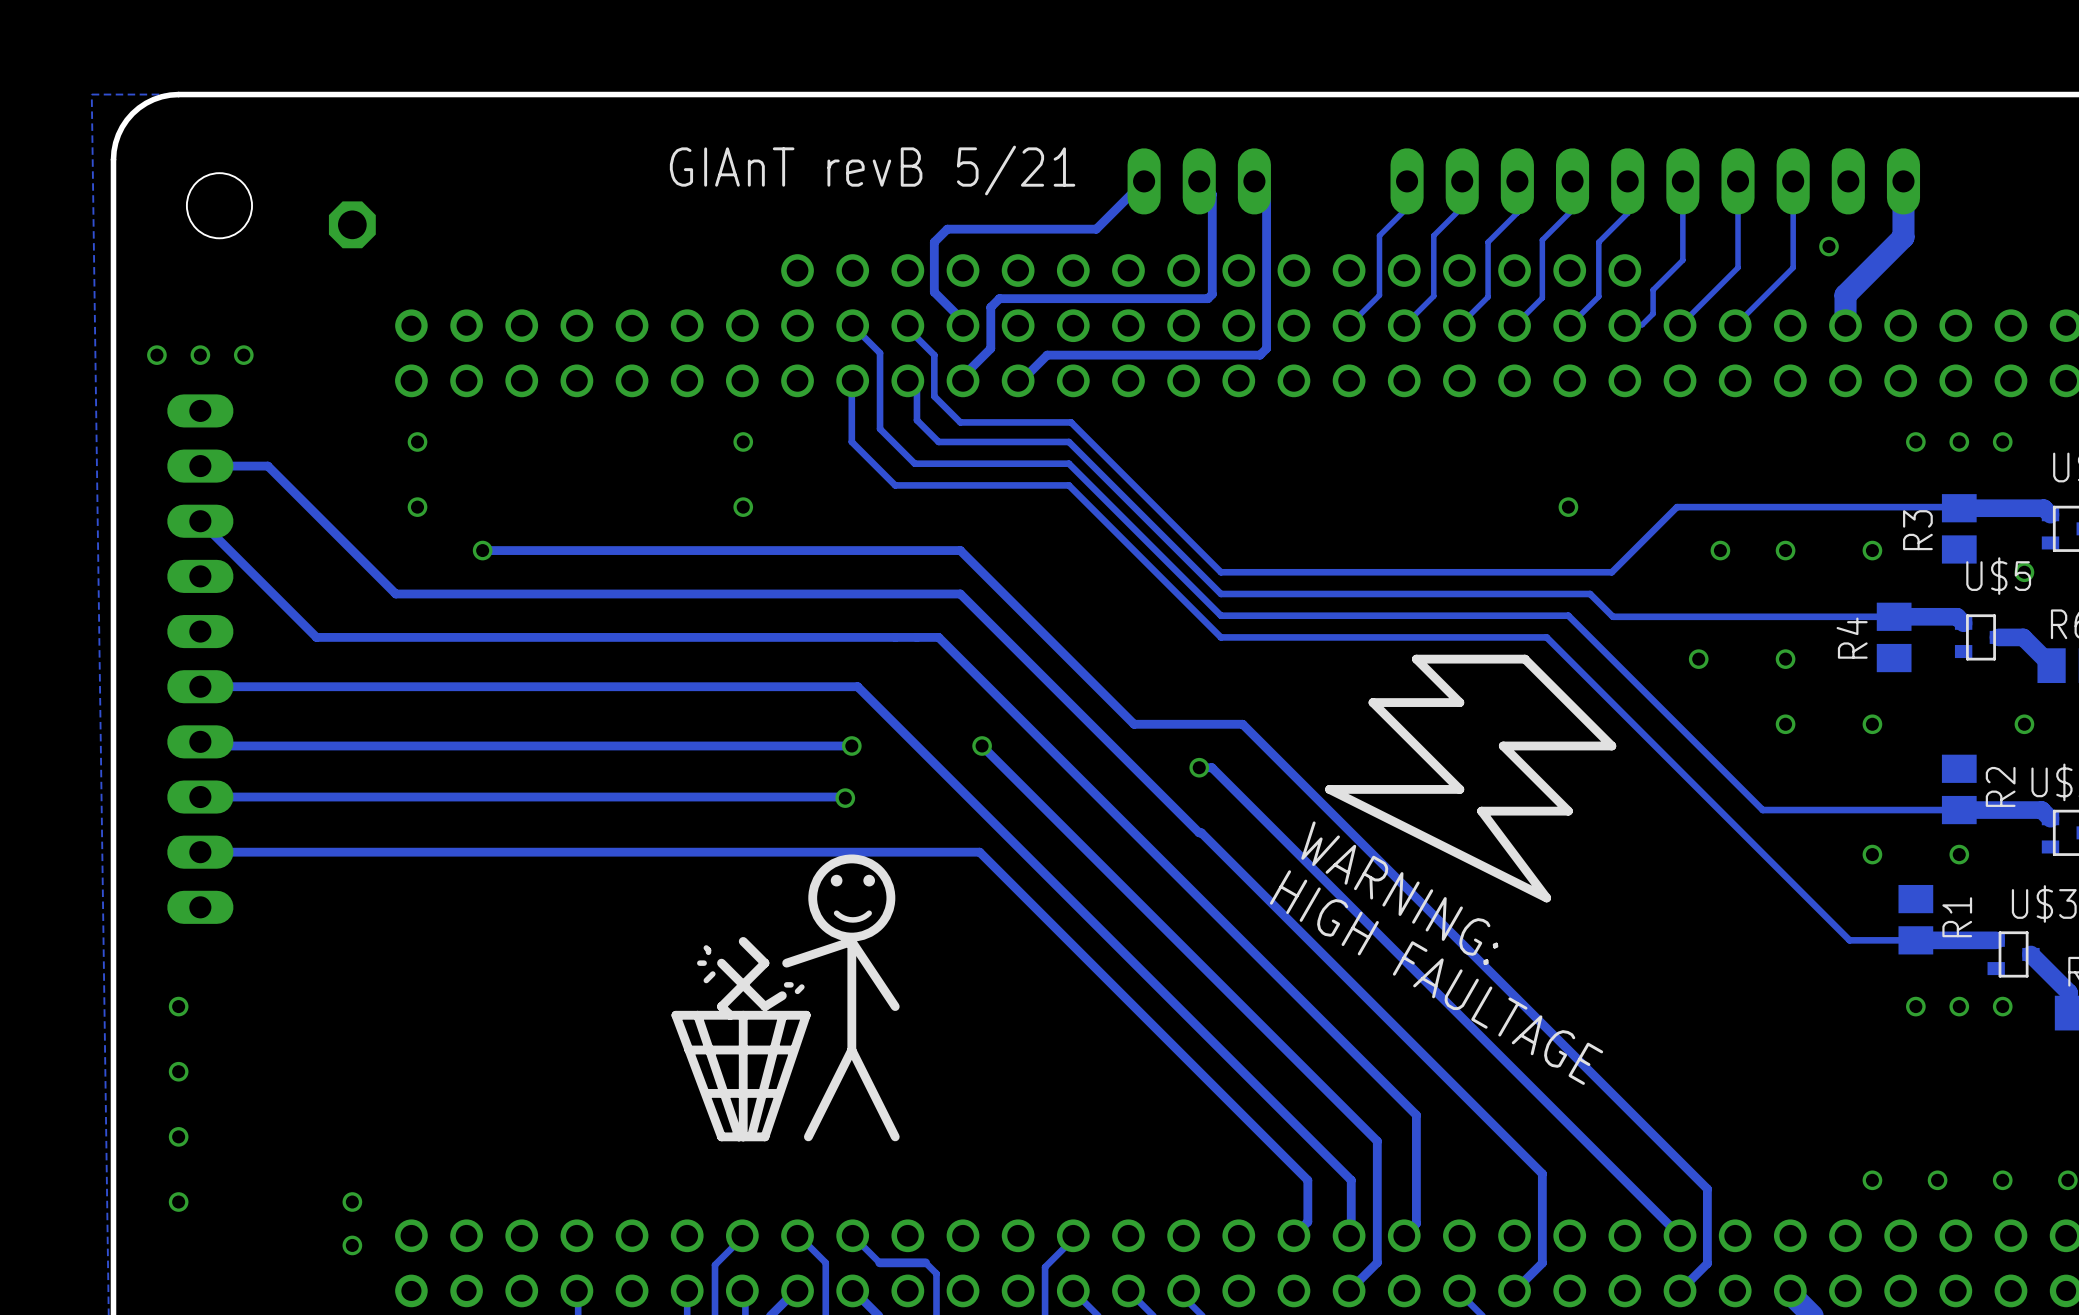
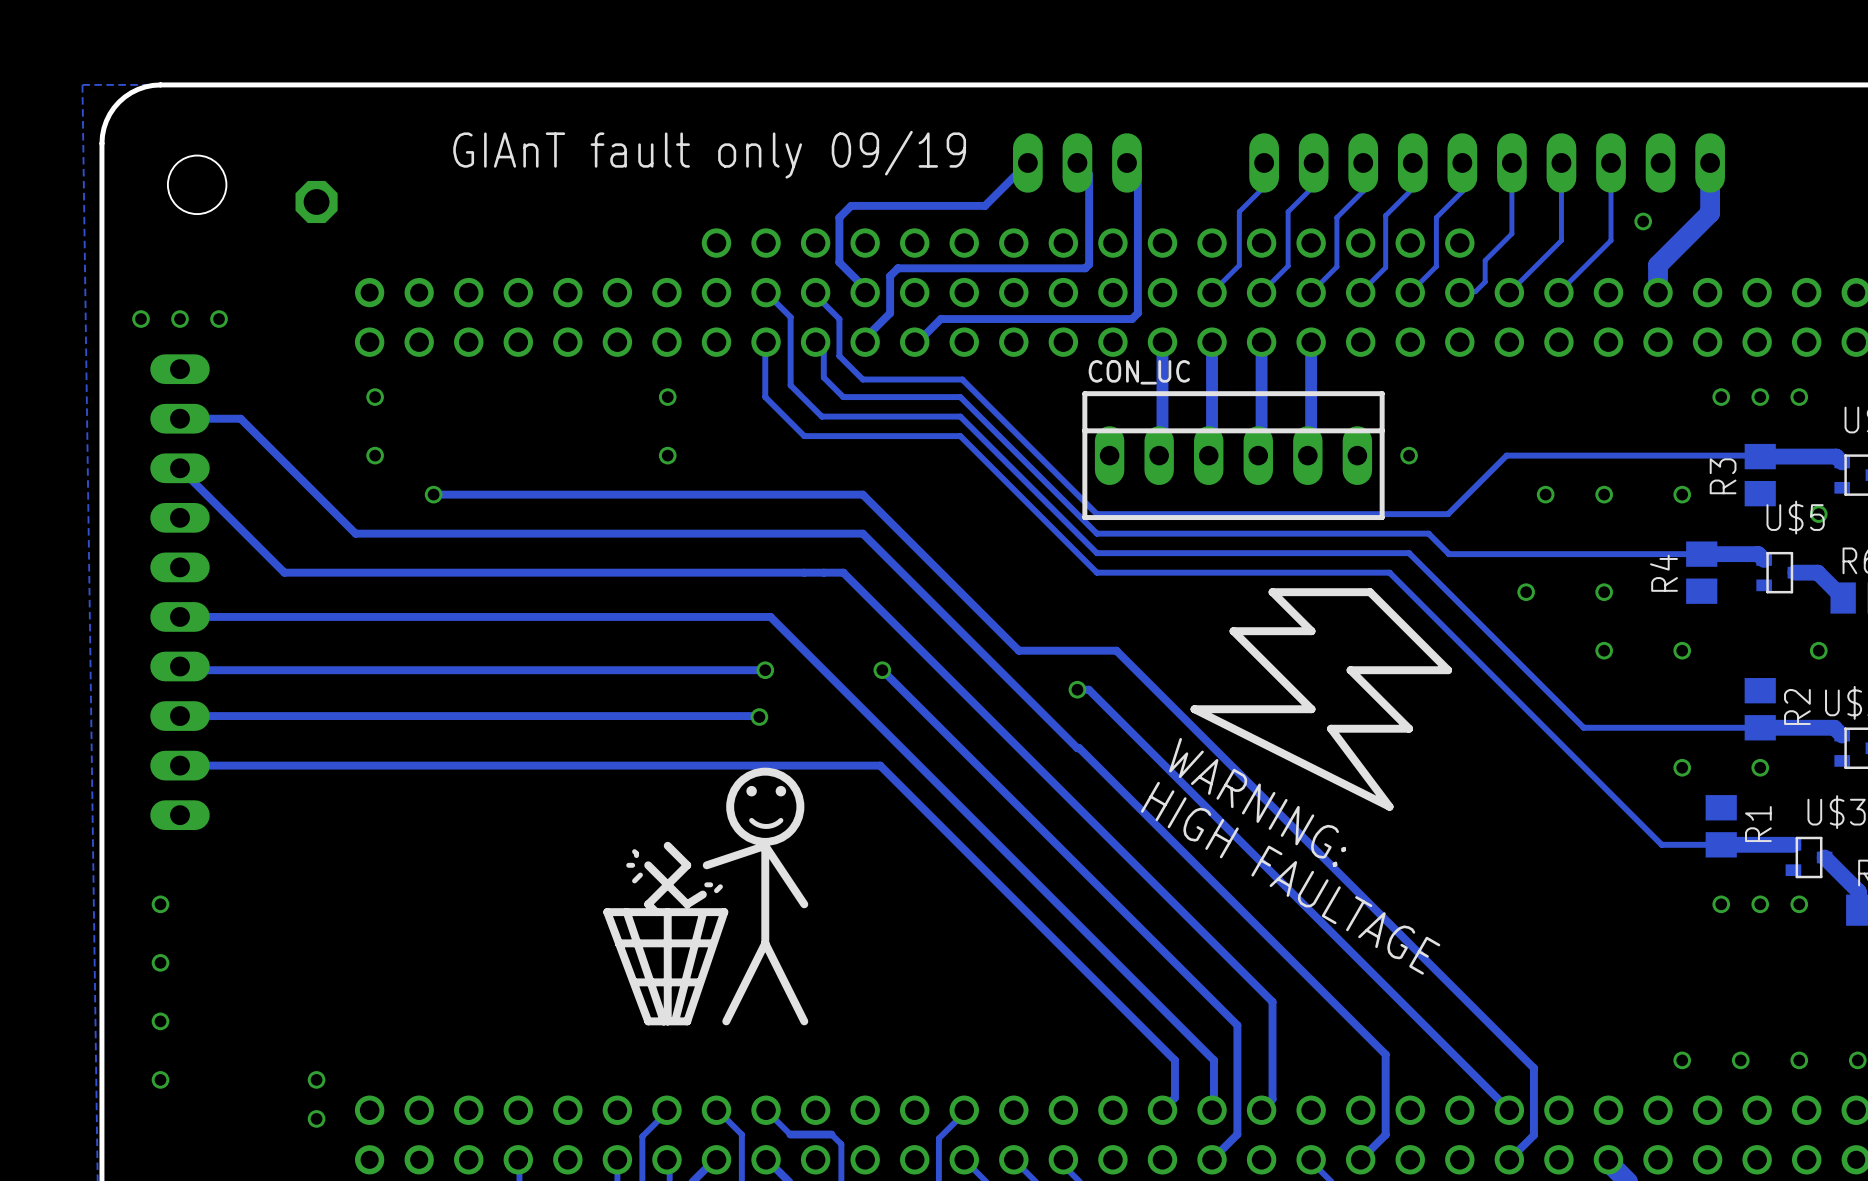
text: GIAnT revB 5/21 (872, 170) -> GIAnT fault only 09/19 (709, 154)
track: none -> (1162, 342) (1162, 452) (1159, 455)
track: none -> (1212, 342) (1212, 452) (1208, 455)
track: none -> (1261, 342) (1261, 452) (1258, 455)
track: none -> (1311, 342) (1311, 452) (1307, 455)
CON_UC: none -> (1233, 455)

